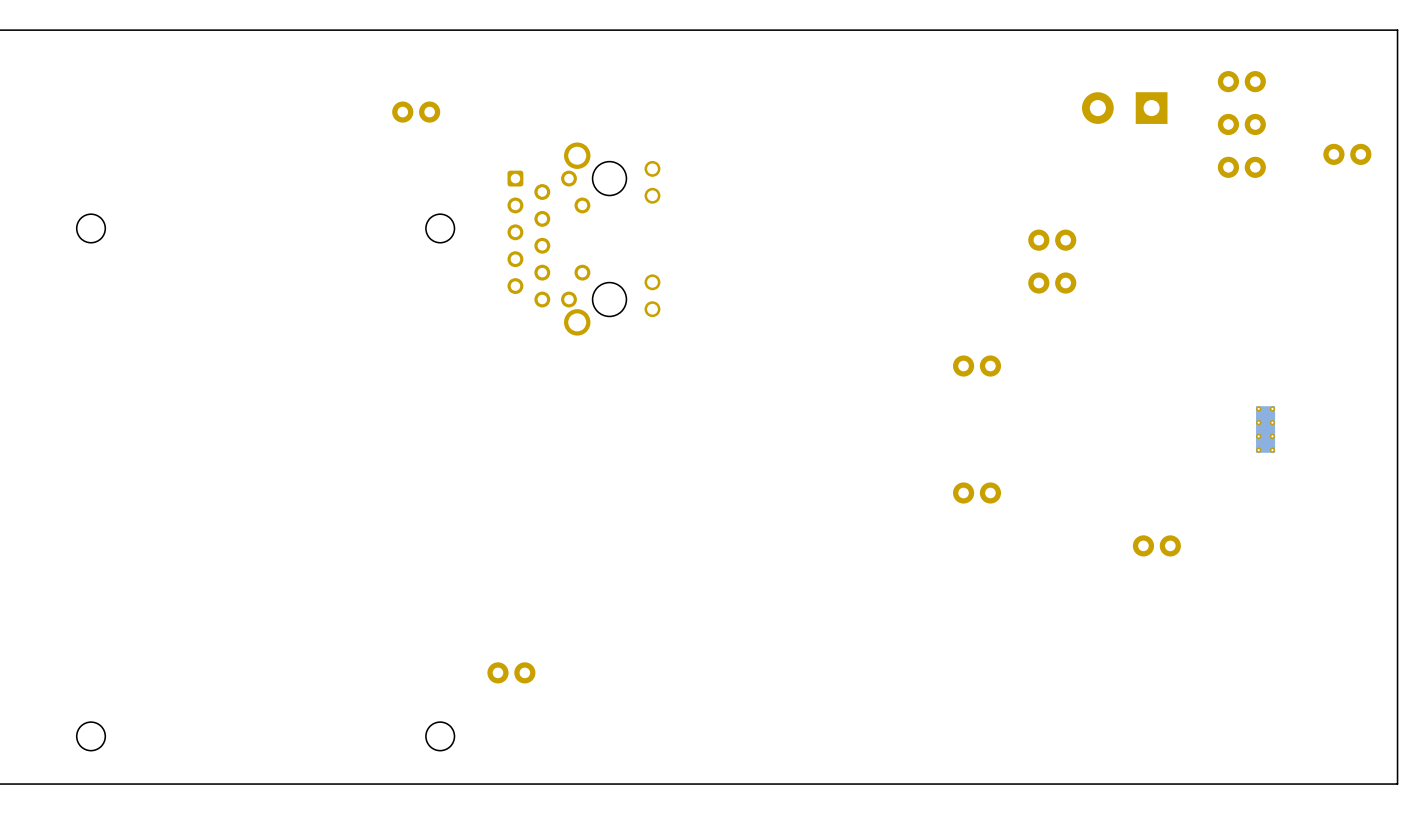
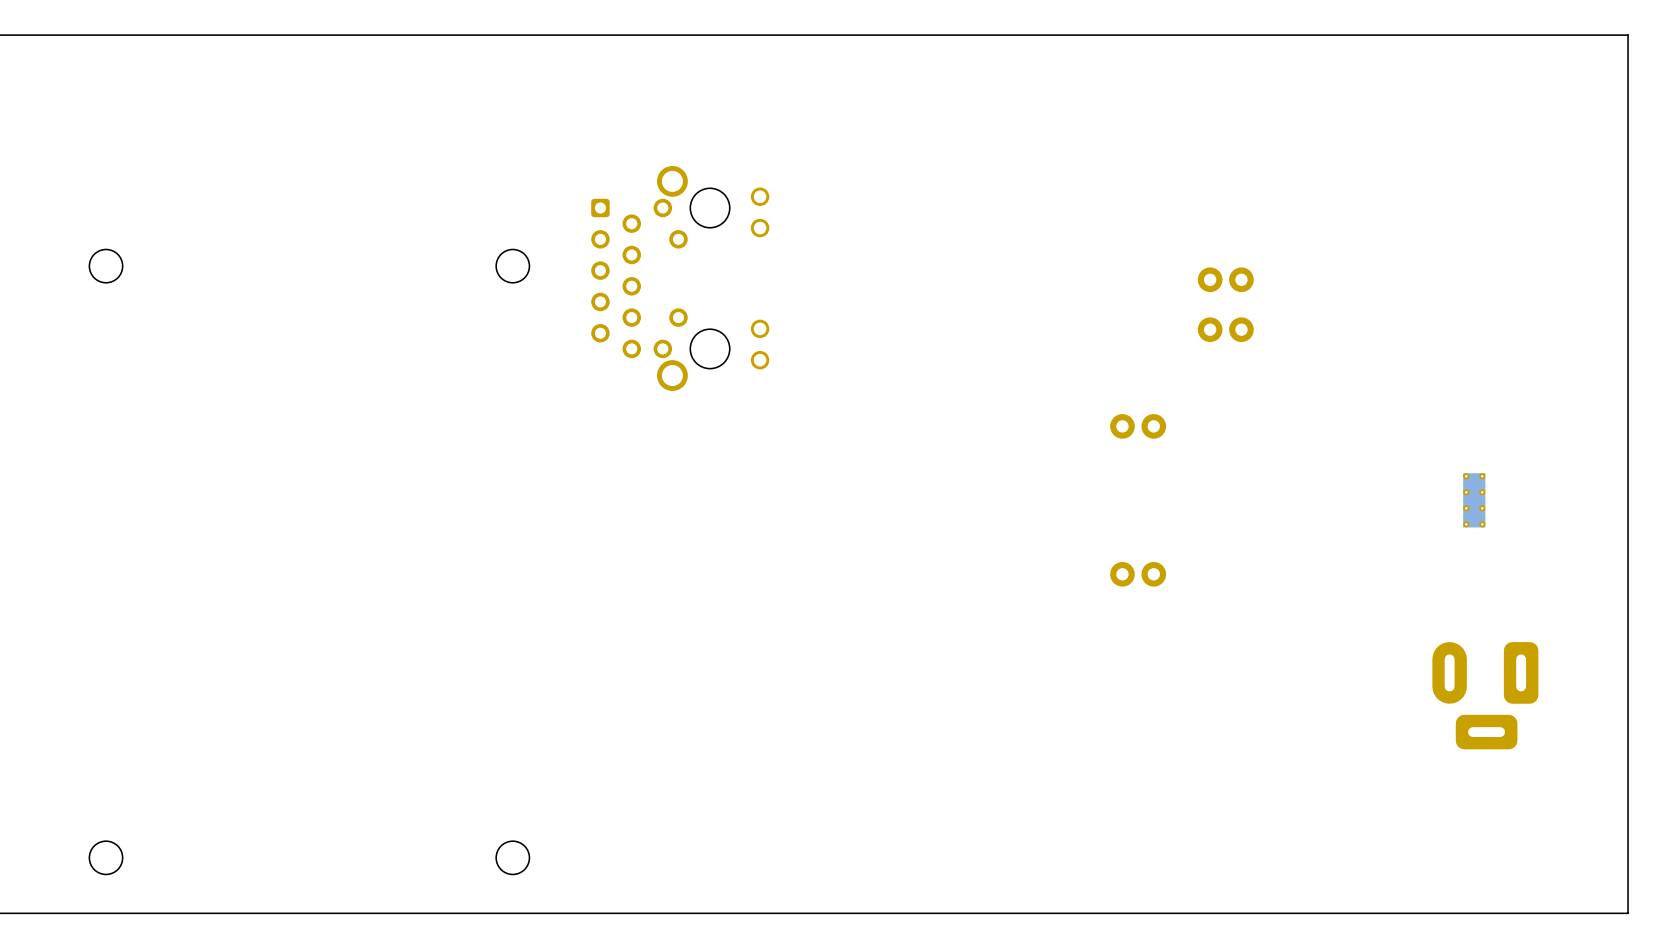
part: (1241, 81) -> none
part: (1124, 108) -> none
part: (416, 112) -> none
part: (1241, 124) -> none
part: (1347, 154) -> none
part: (1241, 167) -> none
part: (1156, 545) -> none
part: none -> (1485, 695)
part: (511, 672) -> none

